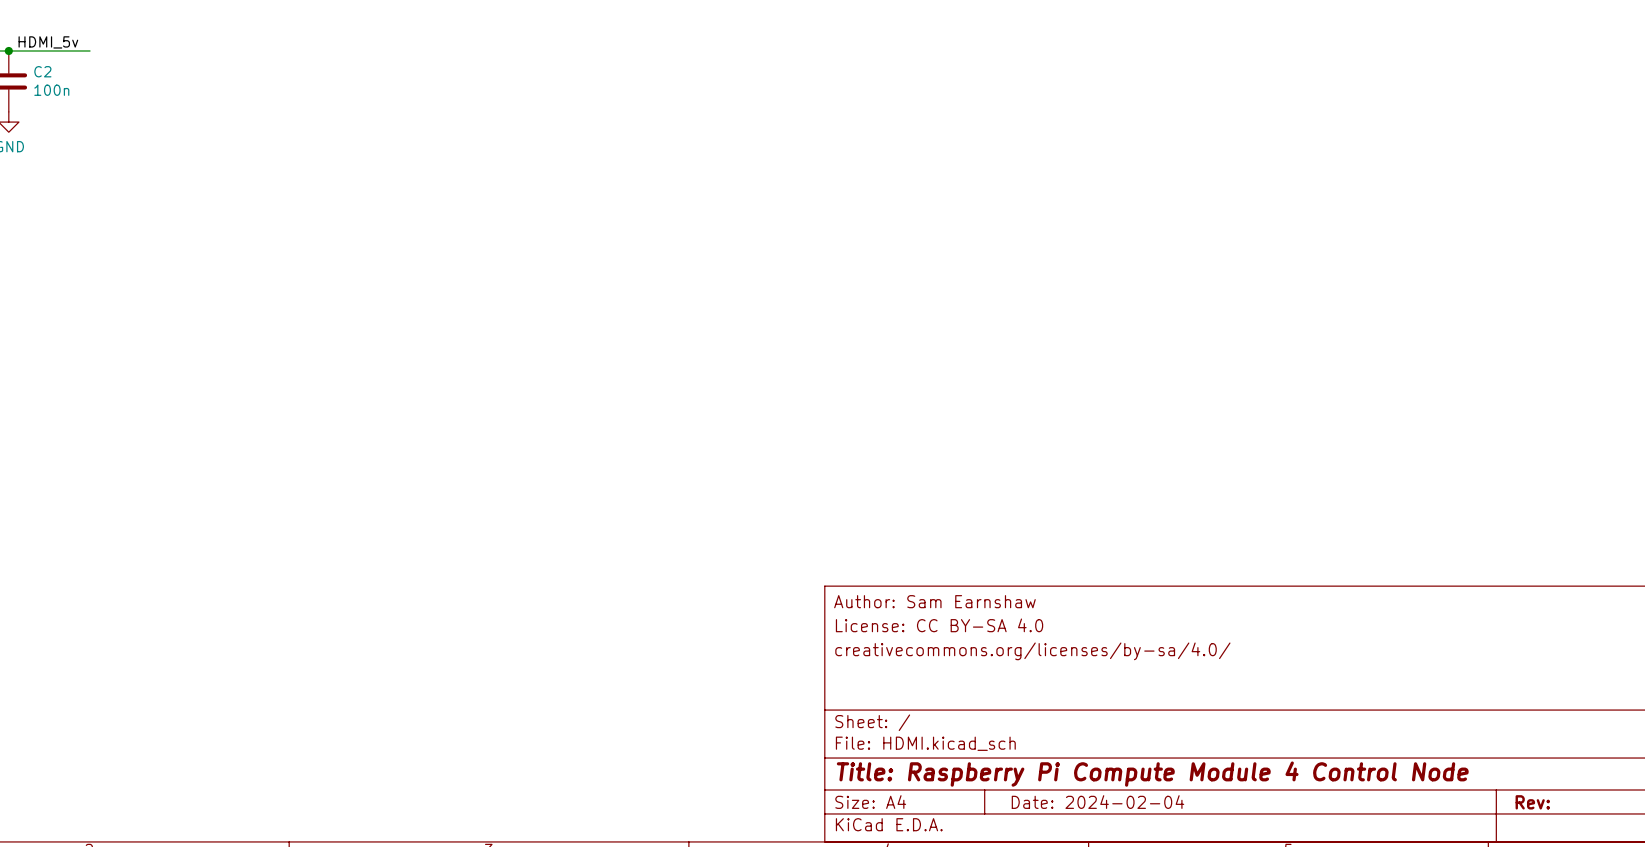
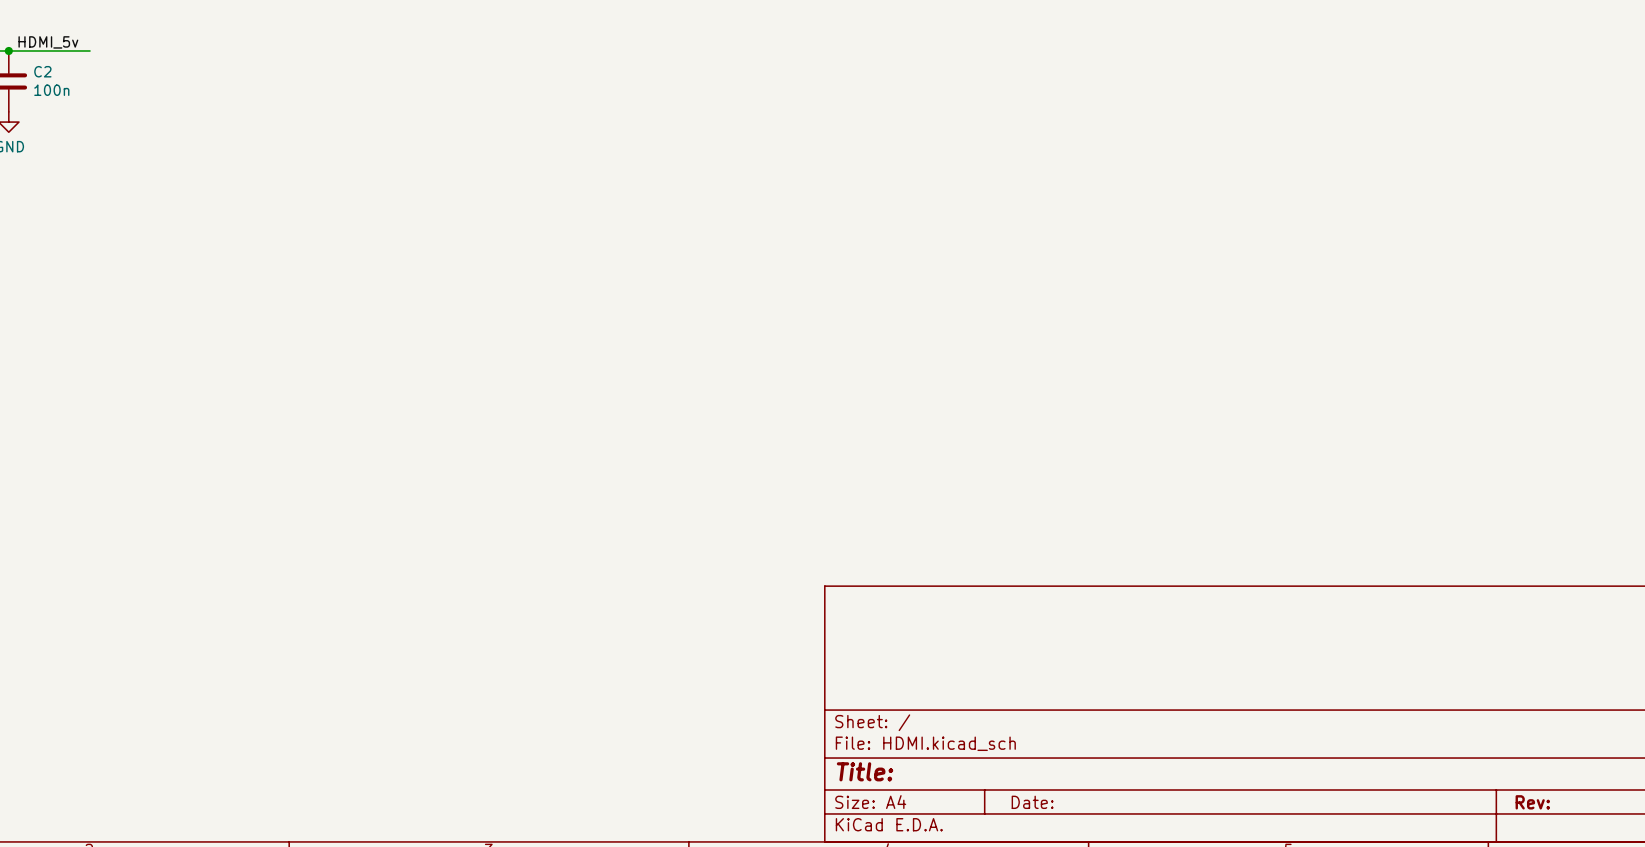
title block: Author: Sam Earnshaw (934, 601) -> none
title block: License: CC BY-SA 4.0 (939, 625) -> none
title block: creativecommons.org/licenses/by-sa/4.0/ (1032, 651) -> none
title block: Title: Raspberry Pi Compute Module 4 Control Node (1152, 774) -> Title: (865, 771)
title block: Date: 2024-02-04 (1097, 802) -> Date: (1032, 802)

